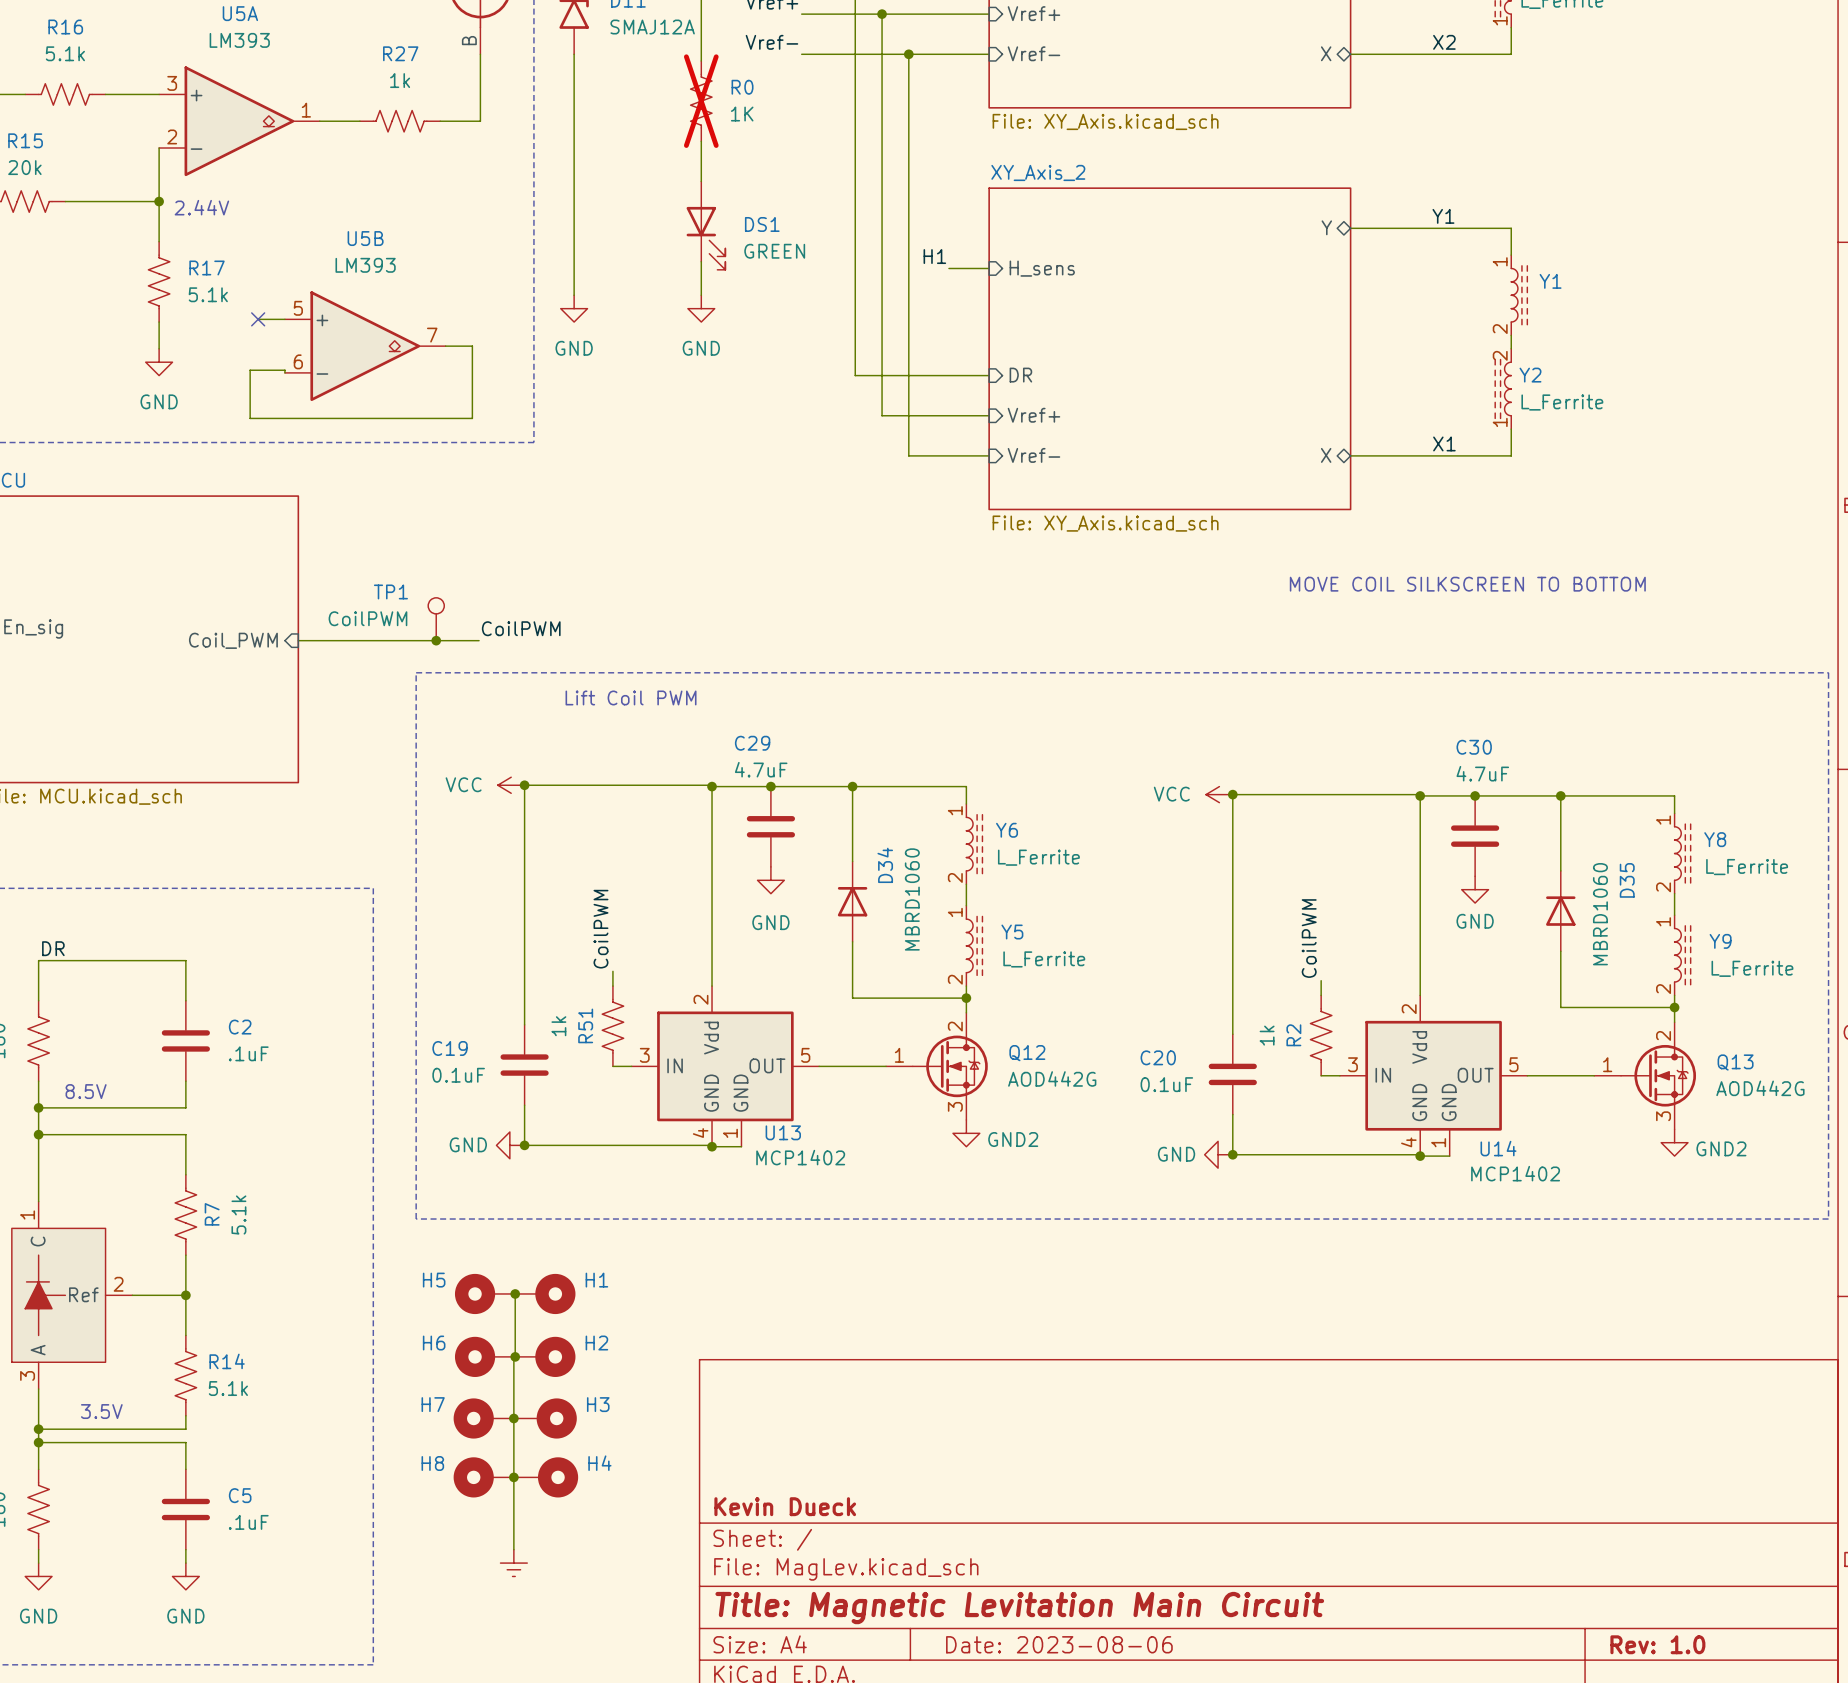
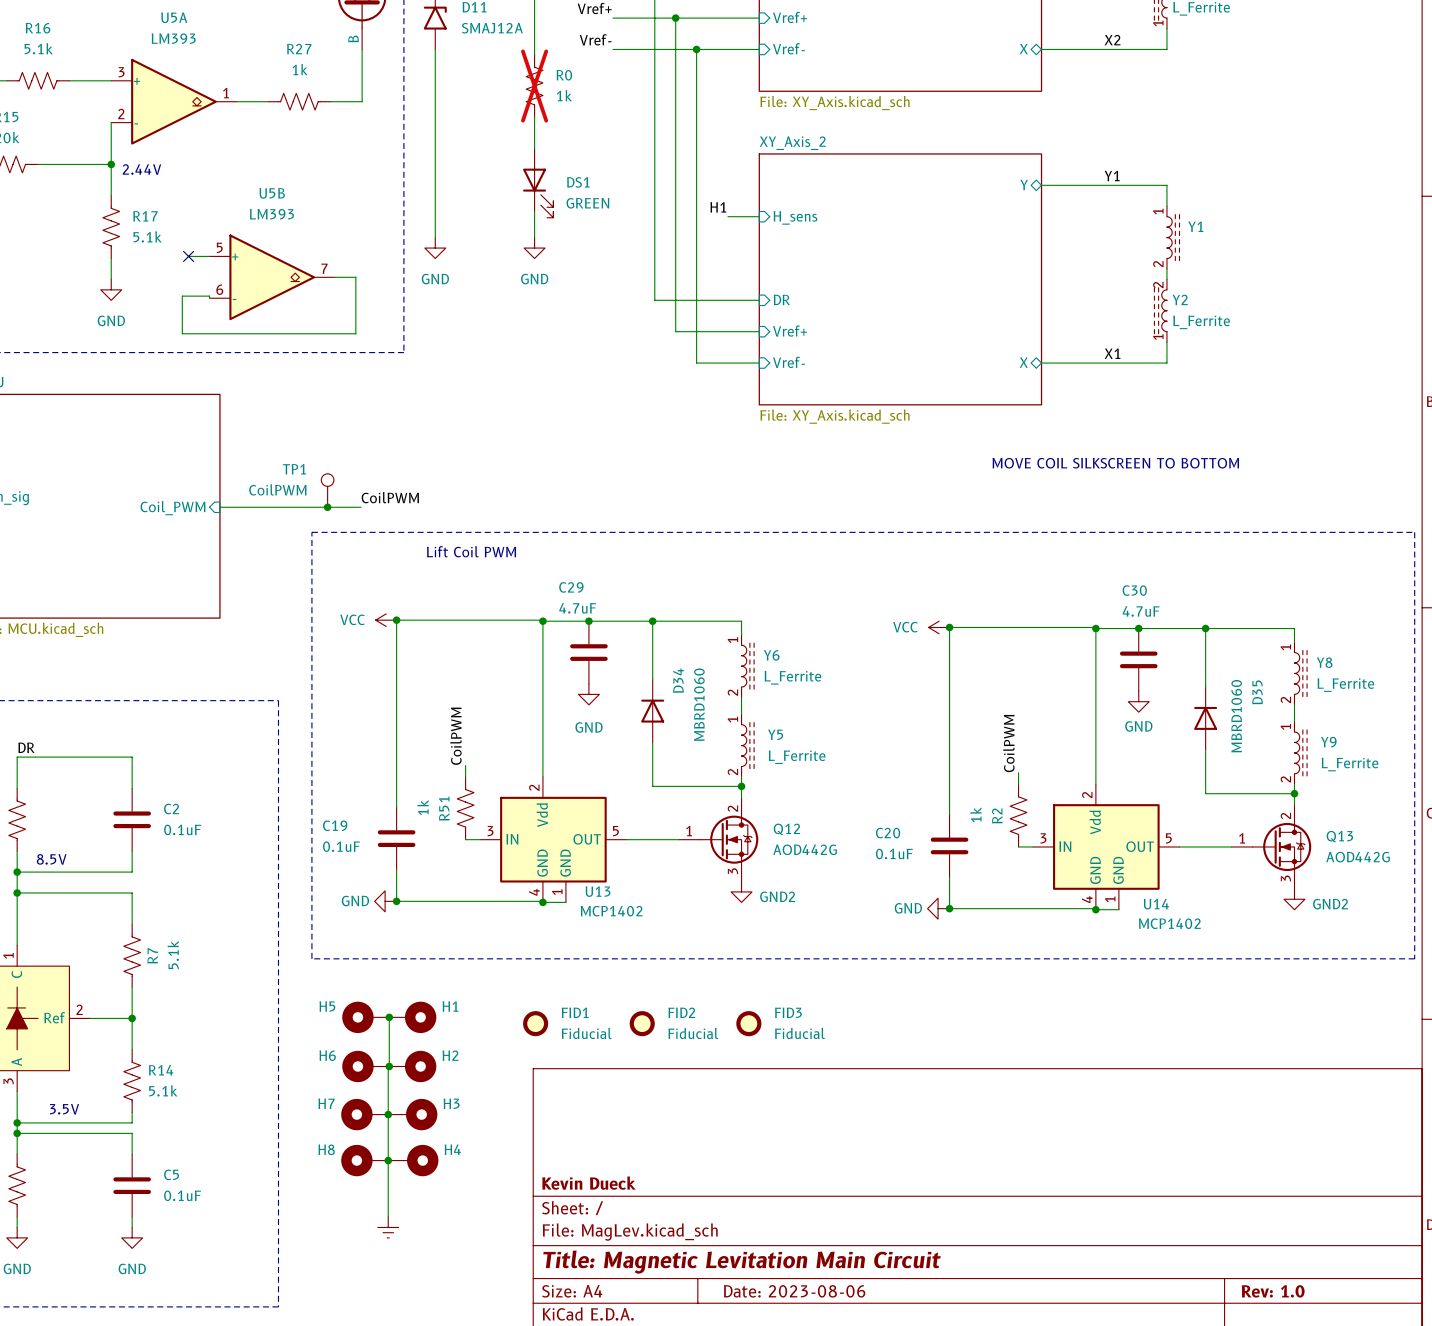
R0 value: 1K (742, 114) -> 1k (564, 95)
C2 value: .1uF (248, 1053) -> 0.1uF (182, 829)
FID1: none -> Fiducial (535, 1023)
FID2: none -> Fiducial (642, 1023)
FID3: none -> Fiducial (748, 1023)
C5 value: .1uF (248, 1522) -> 0.1uF (182, 1195)

